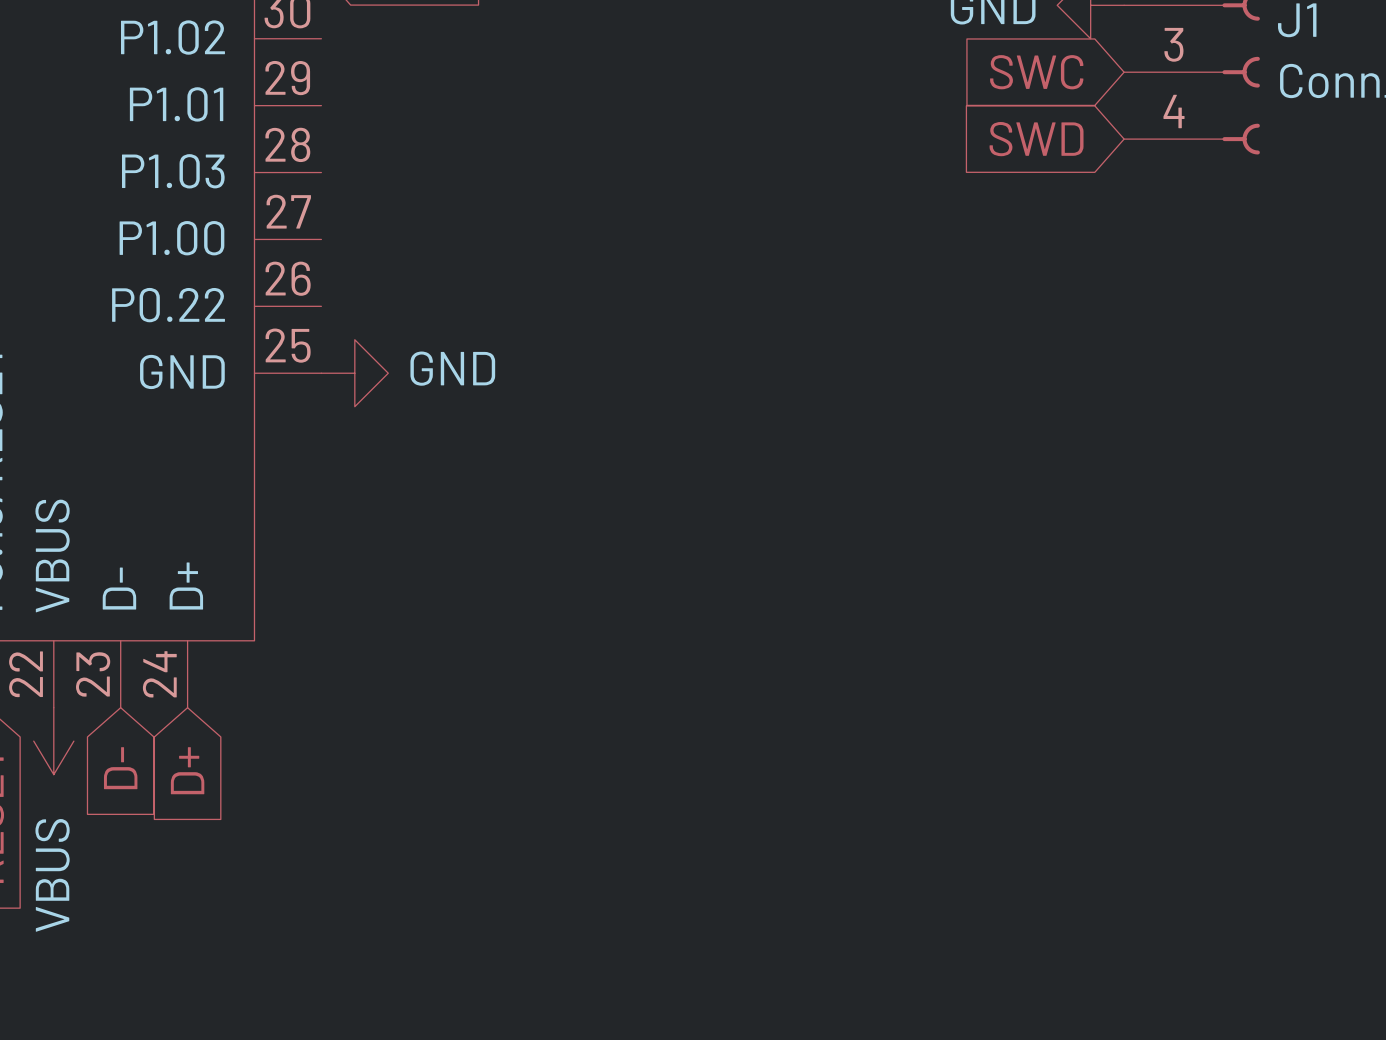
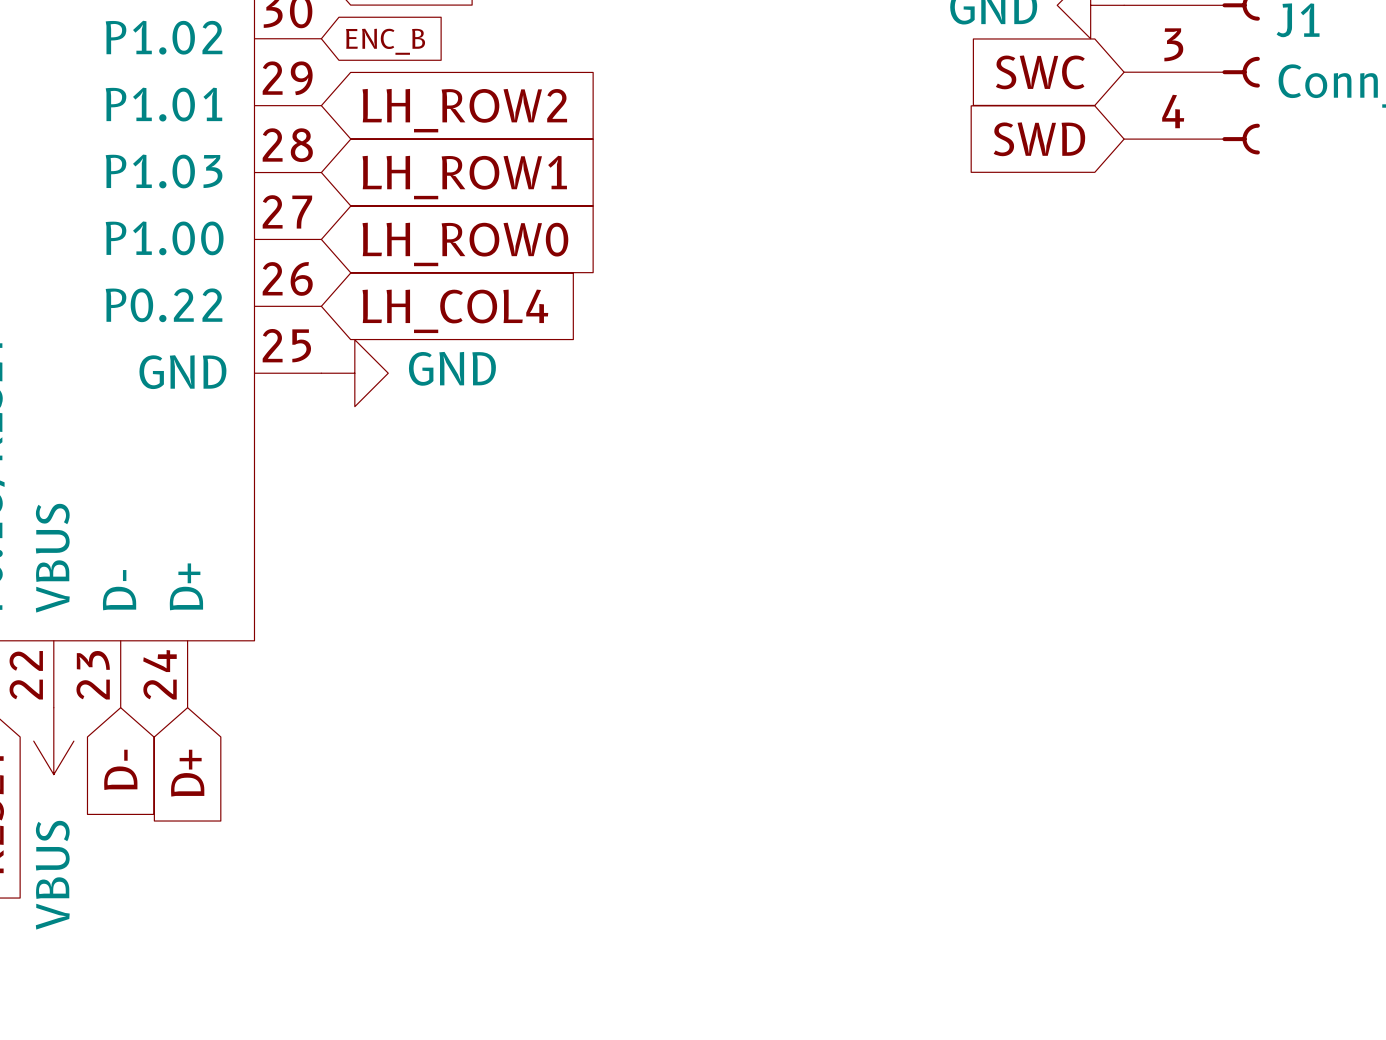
global label: none -> ENC_B (385, 41)
global label: none -> LH_ROW2 (464, 110)
global label: none -> LH_ROW1 (464, 177)
global label: none -> LH_ROW0 (465, 244)
global label: none -> LH_COL4 (455, 311)

